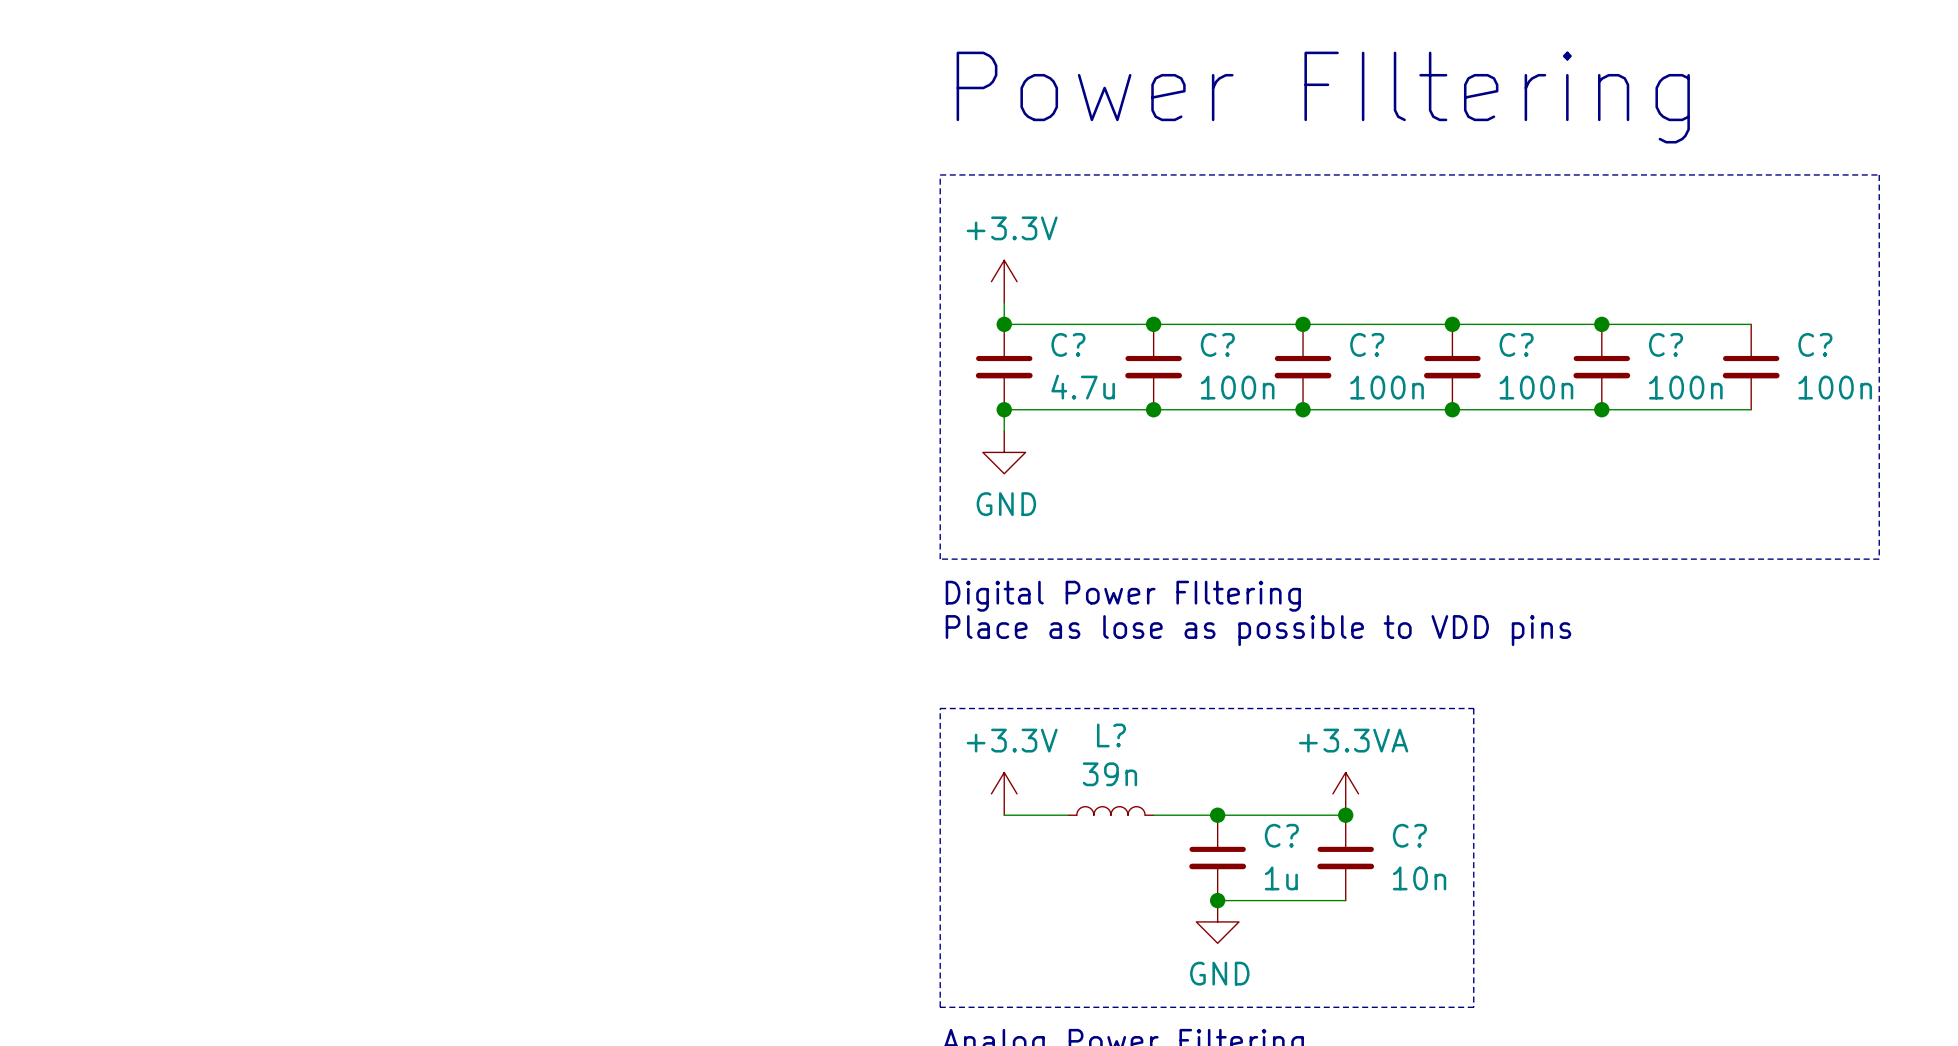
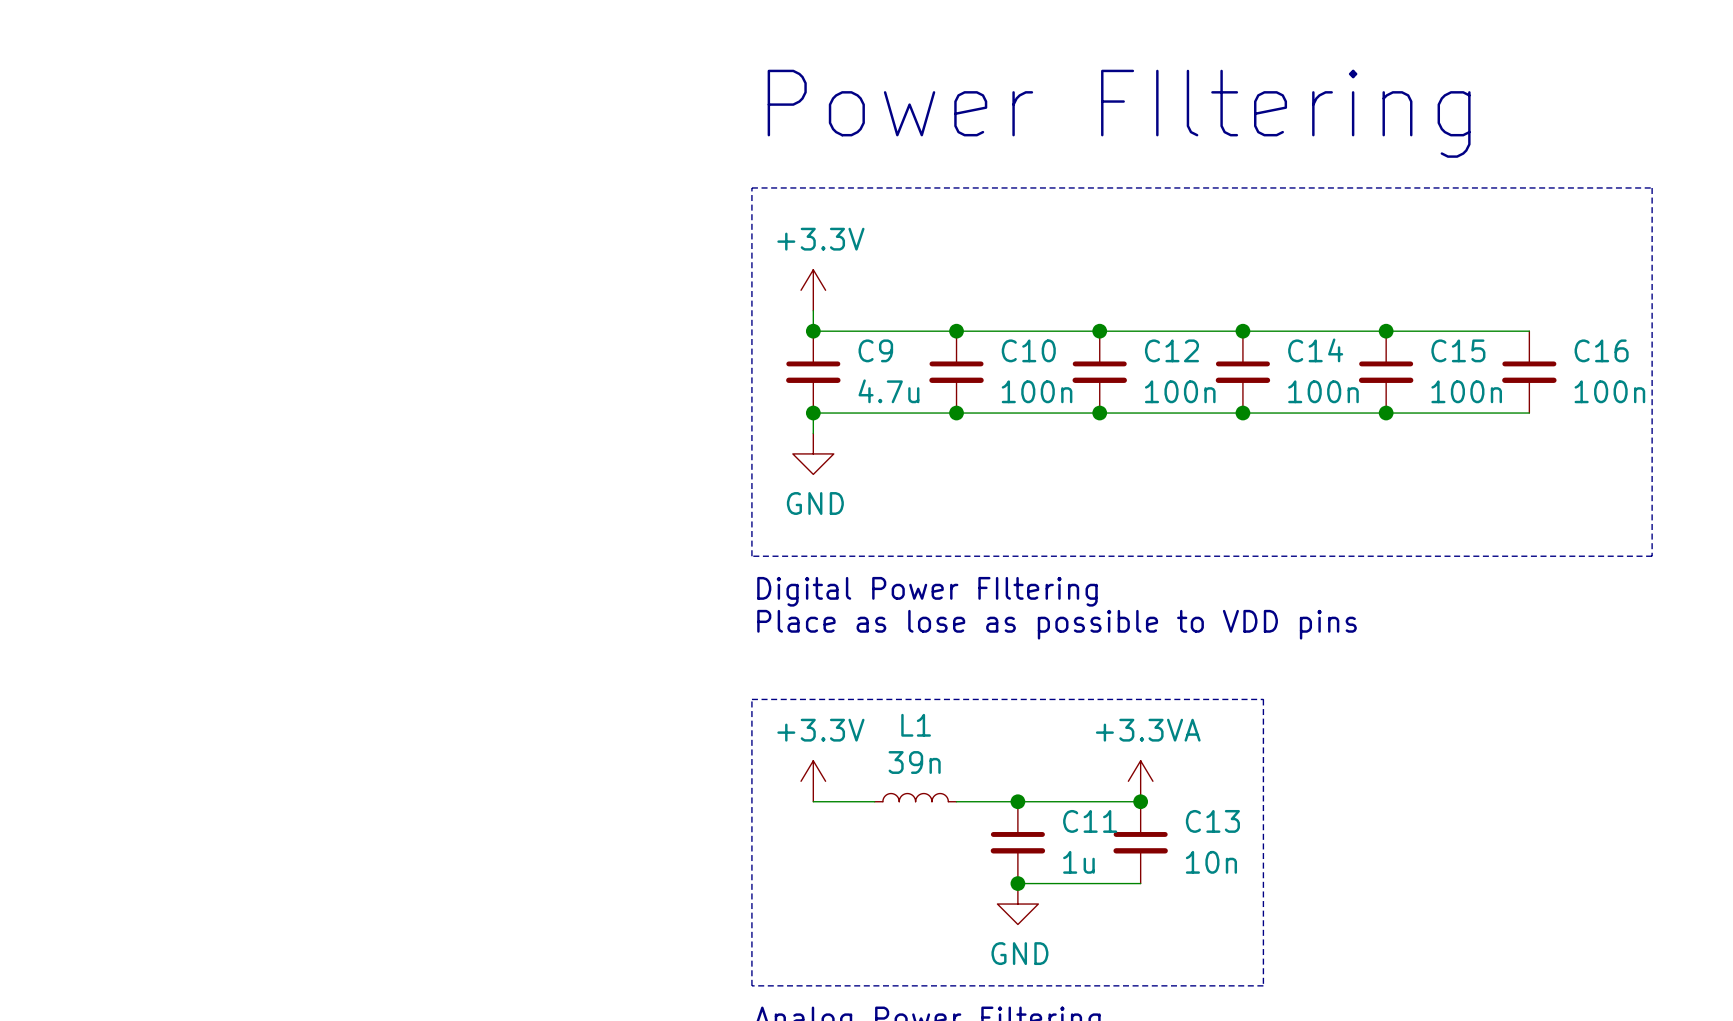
C? name: C? (1068, 344) -> C9 (875, 350)
C? name: C? (1217, 344) -> C10 (1028, 350)
C? name: C? (1367, 344) -> C12 (1171, 350)
C? name: C? (1516, 344) -> C14 (1315, 350)
C? name: C? (1665, 344) -> C15 (1458, 350)
C? name: C? (1815, 344) -> C16 (1601, 350)
L? name: L? (1111, 735) -> L1 (916, 725)
C? name: C? (1281, 835) -> C11 (1090, 821)
C? name: C? (1409, 835) -> C13 (1212, 821)

